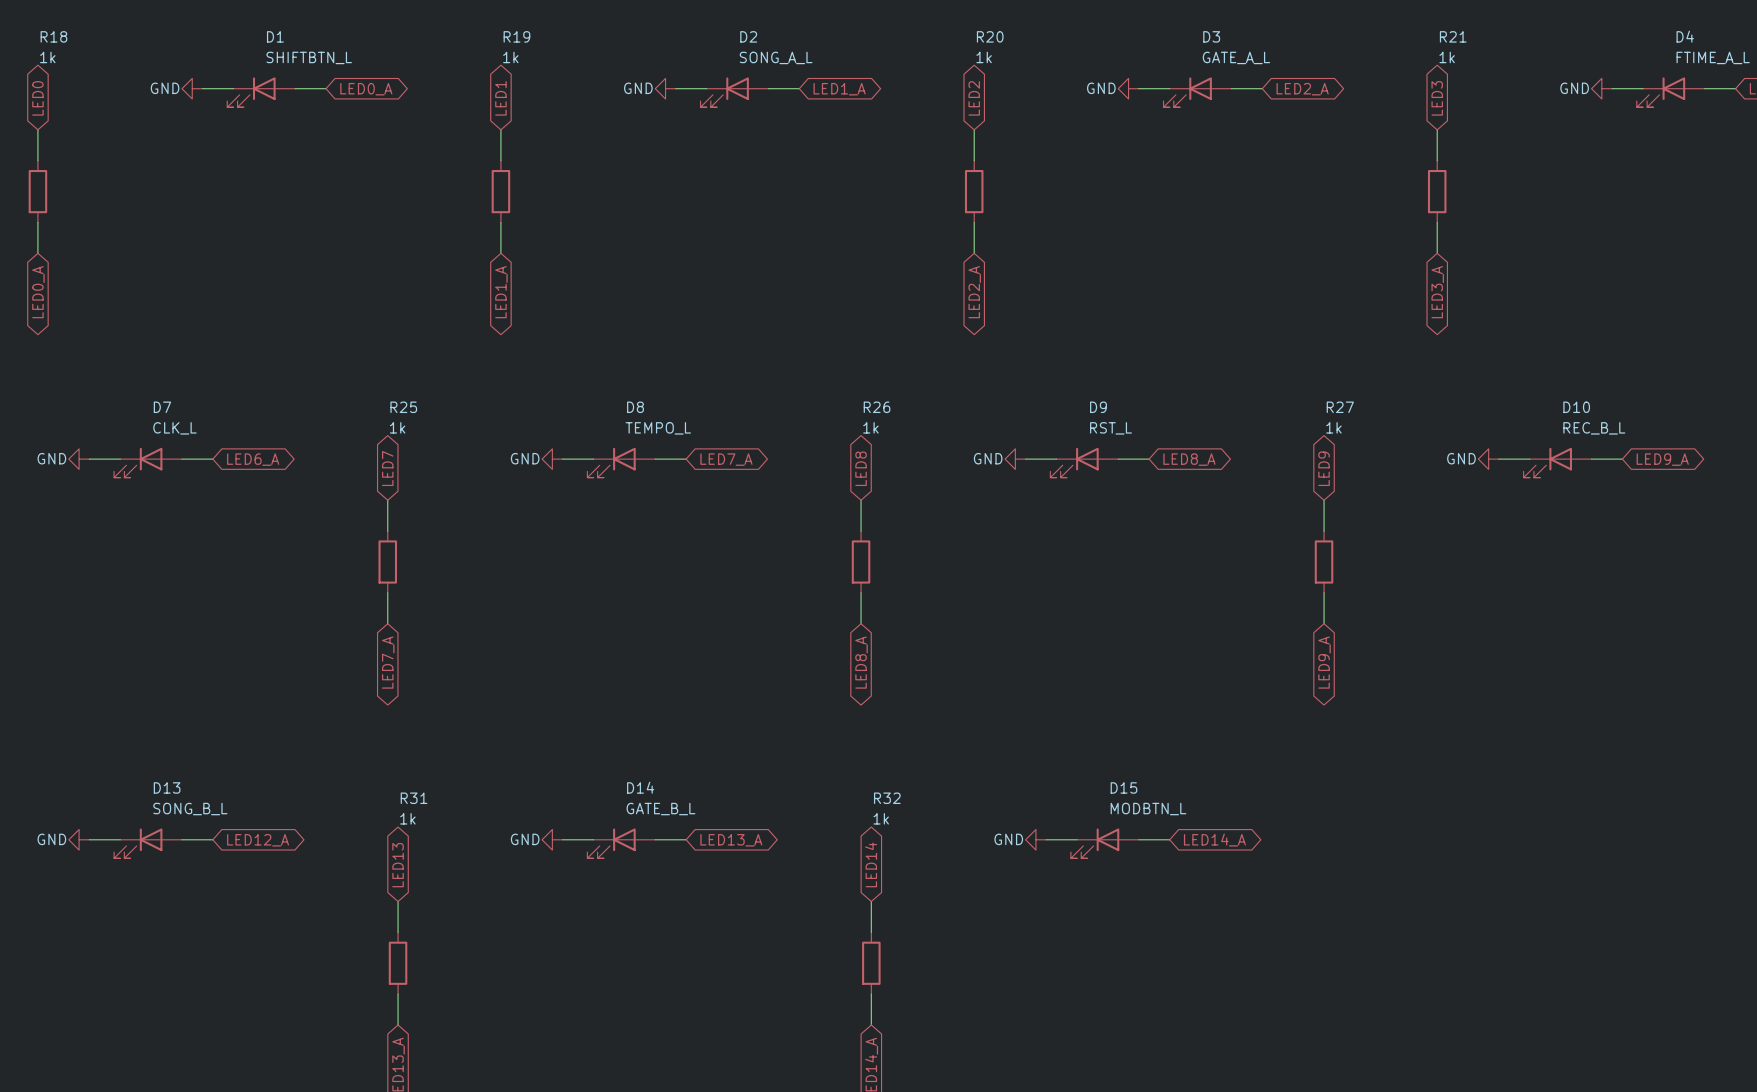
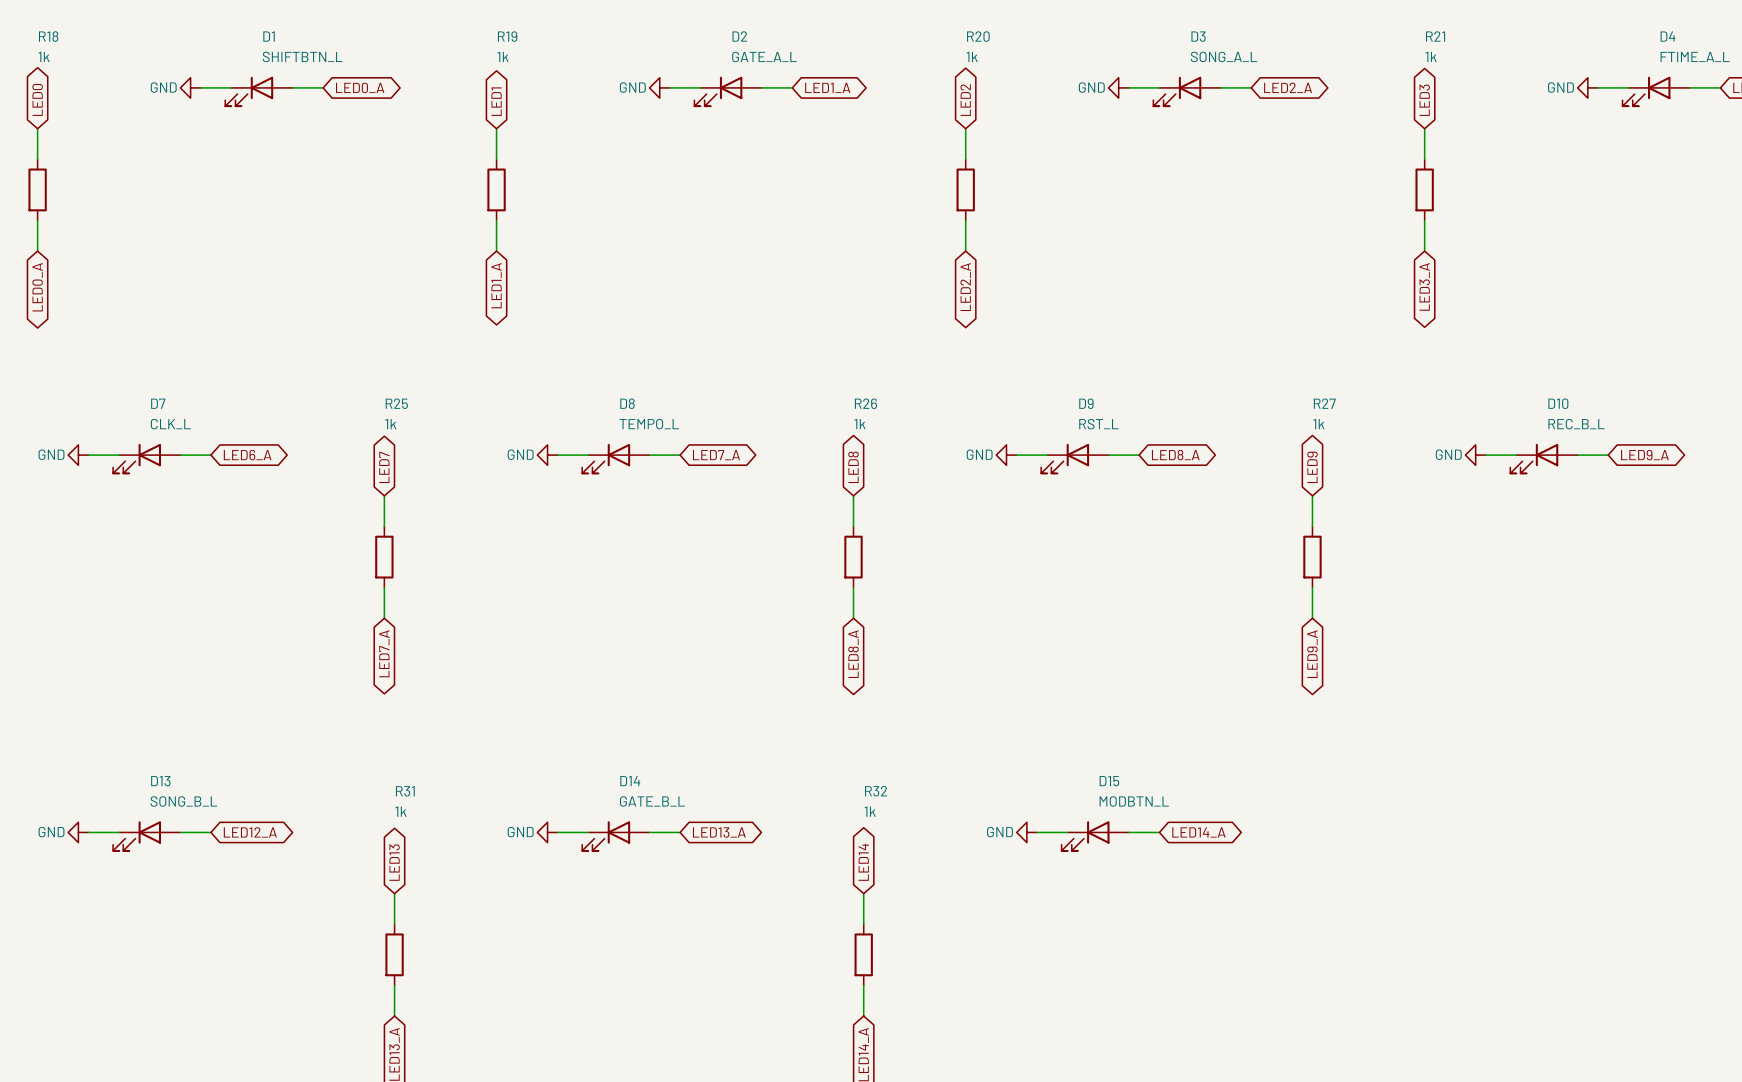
D2 value: SONG_A_L (776, 57) -> GATE_A_L (764, 56)
D3 value: GATE_A_L (1236, 57) -> SONG_A_L (1223, 56)

